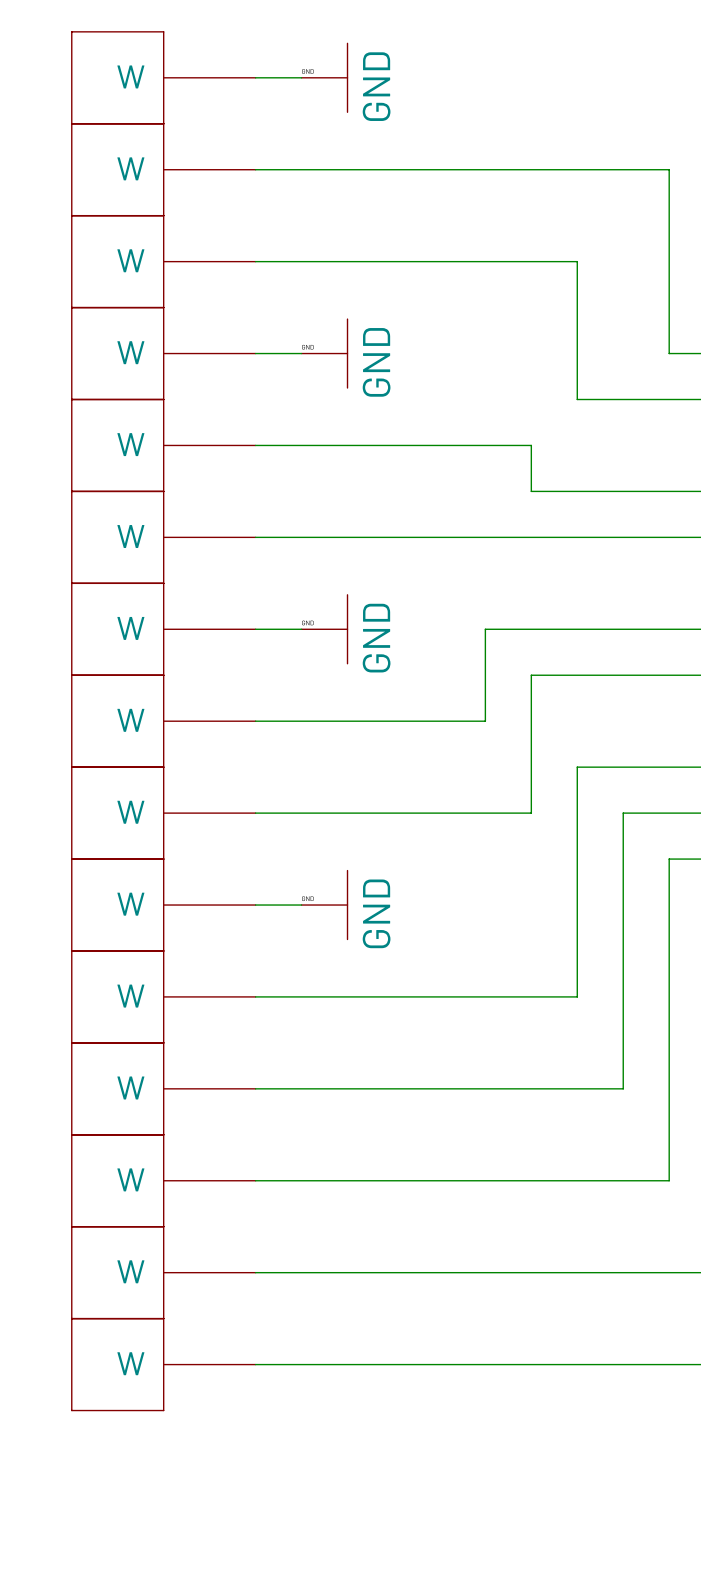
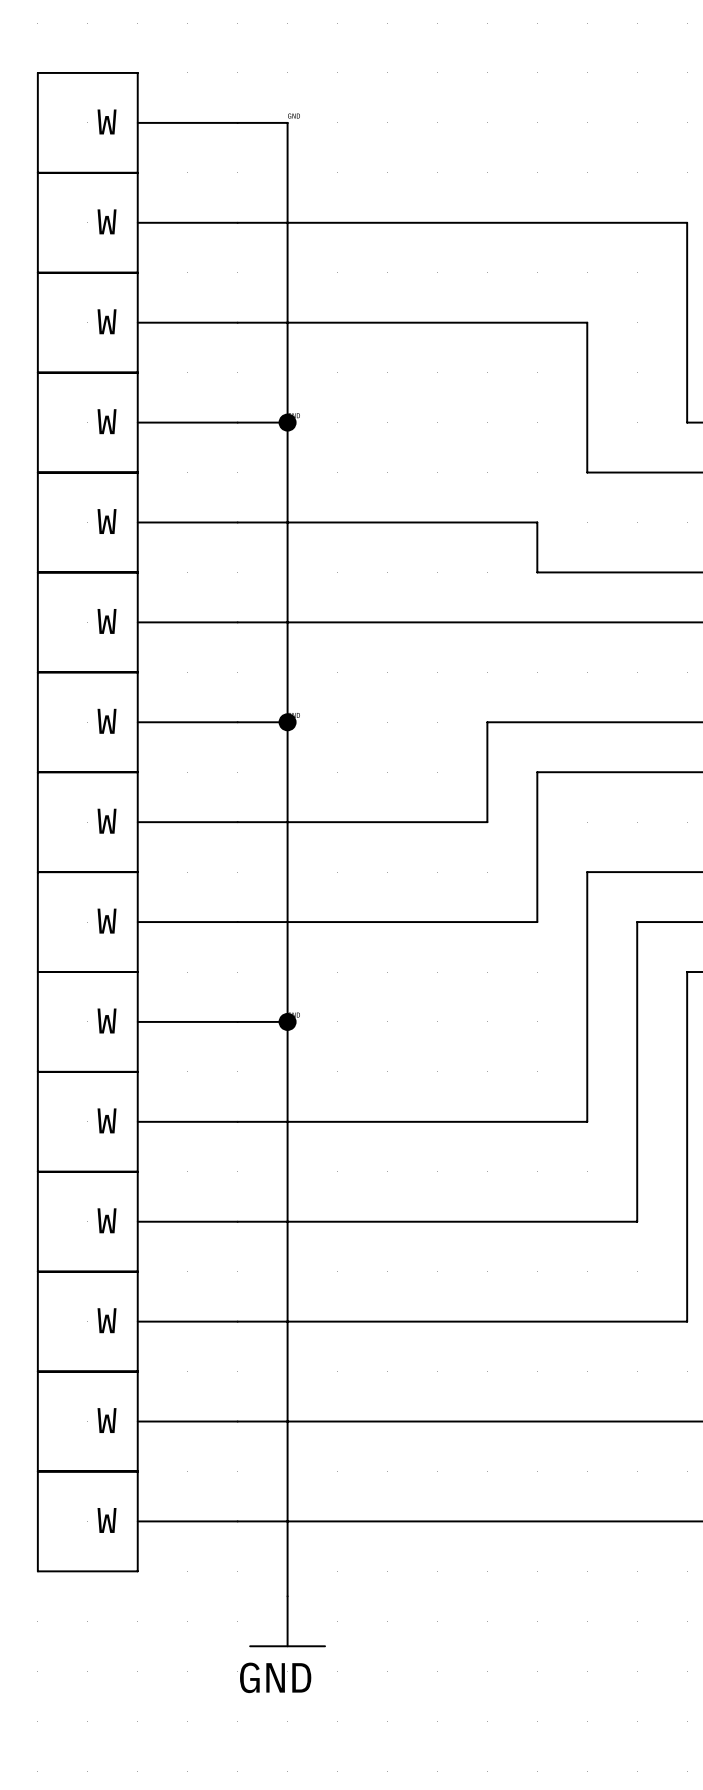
wire: none -> (287, 122) (287, 1596)
power symbol: GND (324, 77) -> none
junction: none -> (287, 422)
power symbol: GND (324, 353) -> none
junction: none -> (287, 722)
power symbol: GND (324, 629) -> none
junction: none -> (287, 1021)
power symbol: GND (324, 905) -> none
power symbol: none -> GND (287, 1621)

